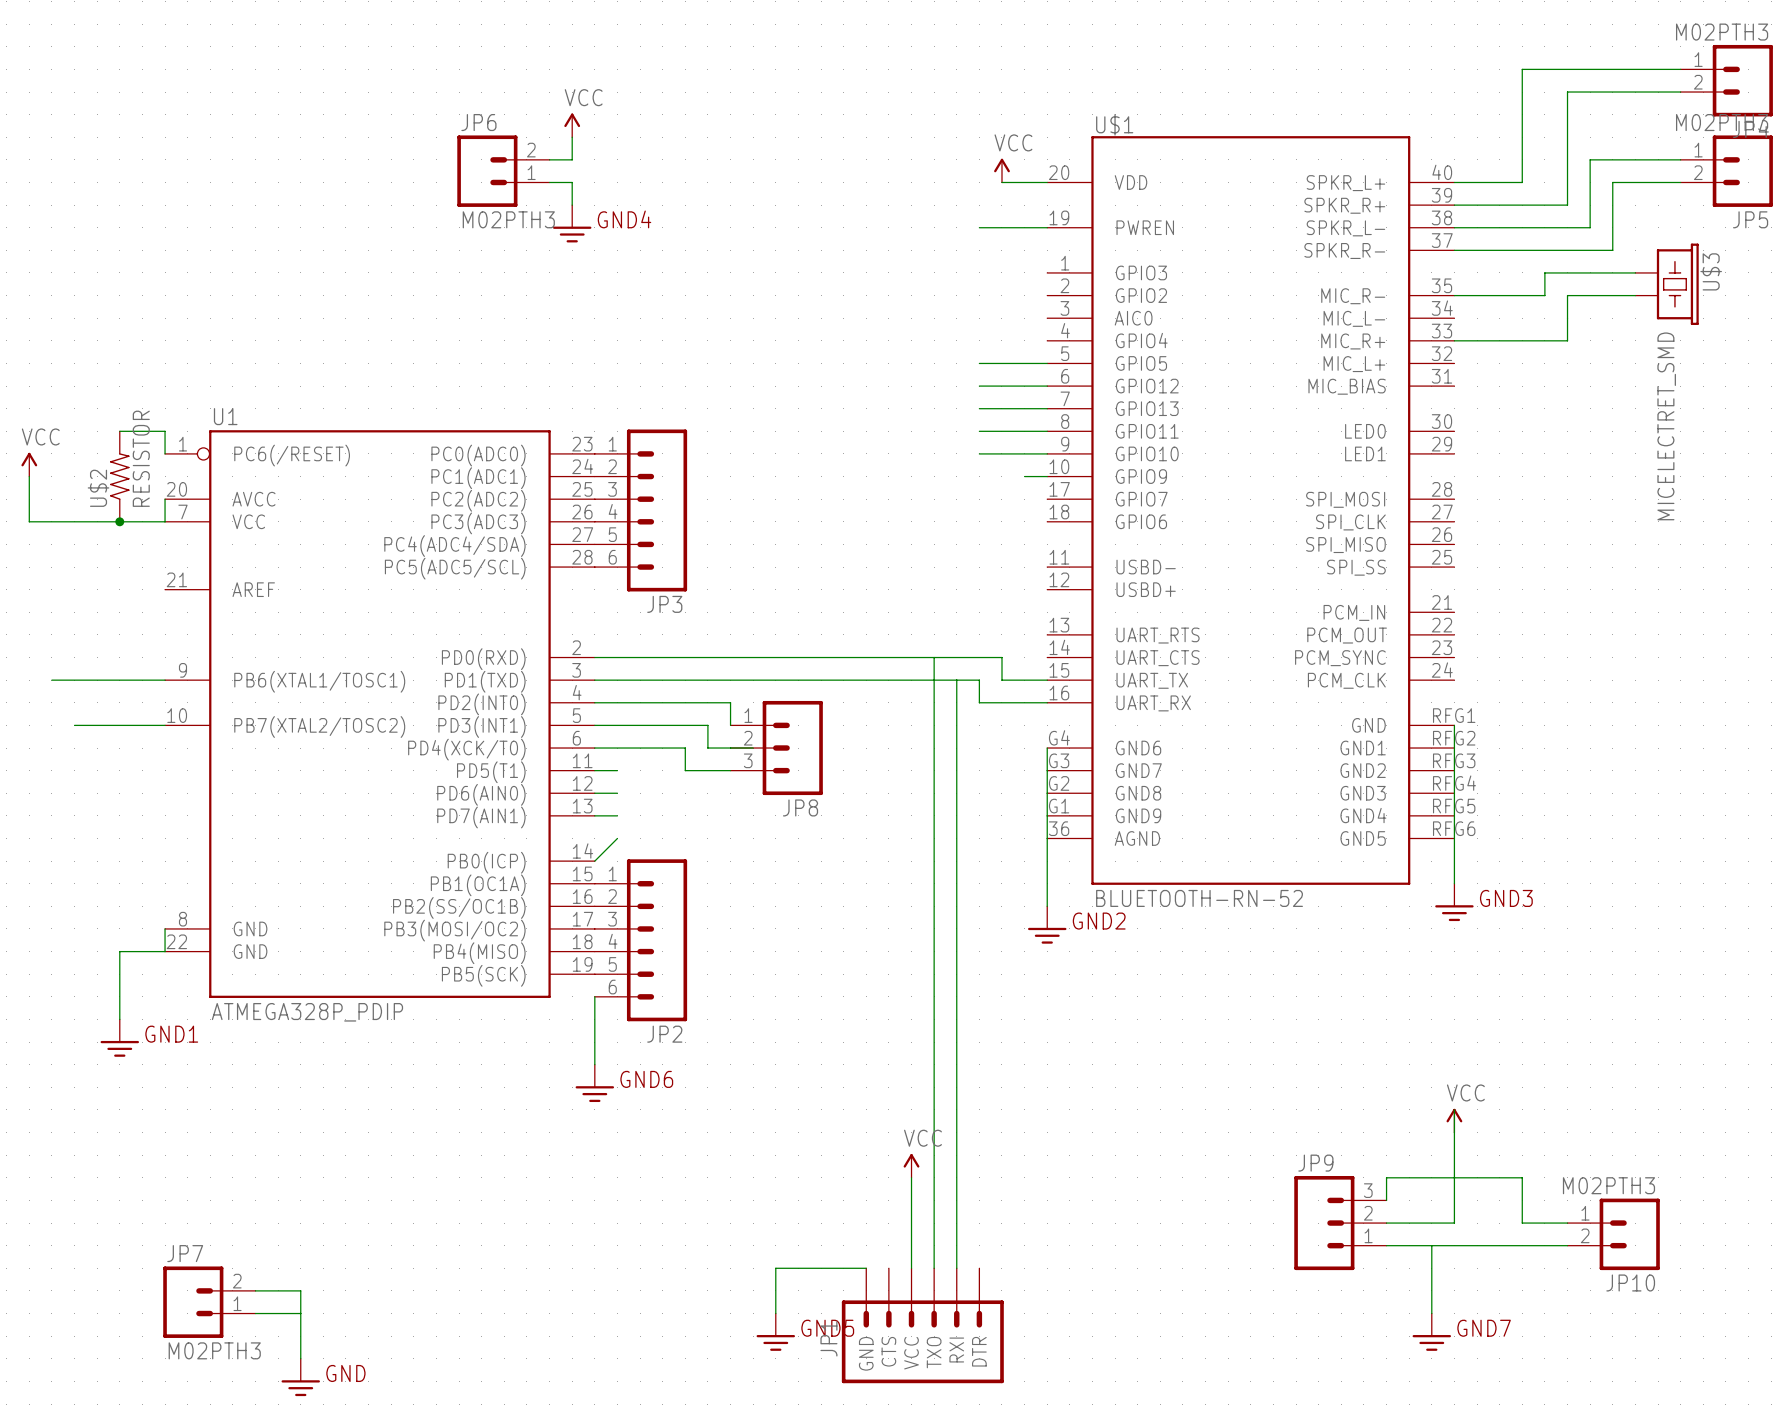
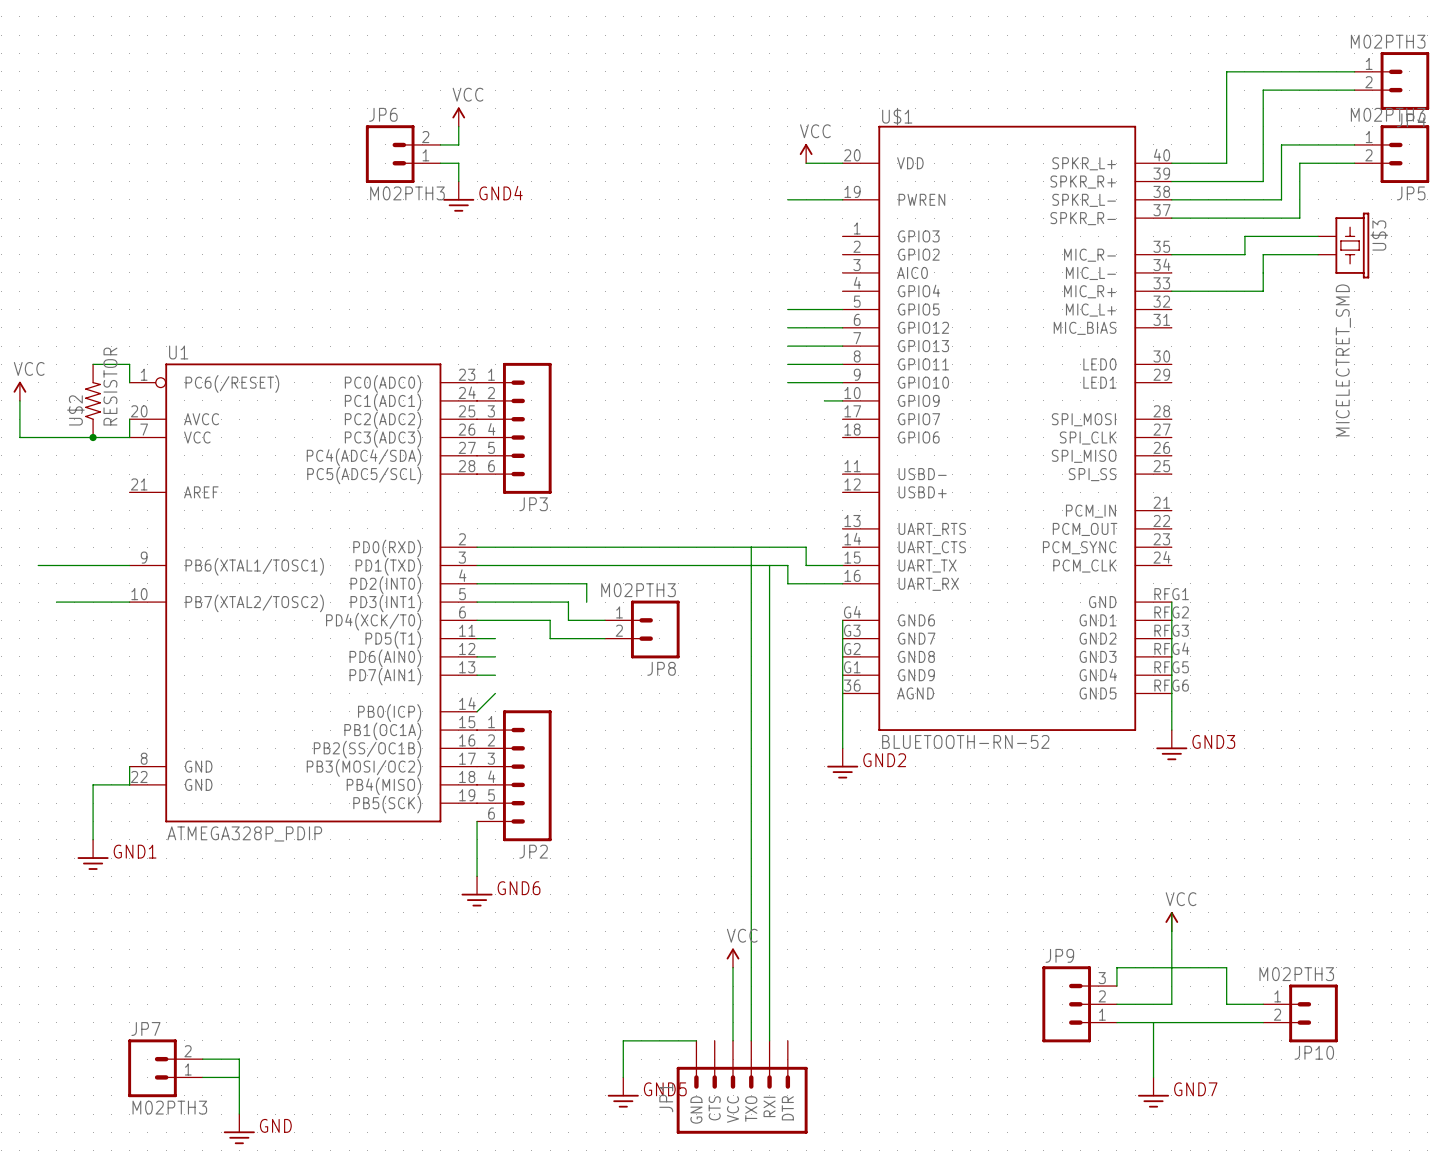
JP8 symbol: [730, 700, 823, 796] -> [605, 600, 680, 659]
JP8 value: none -> M02PTH3 (638, 590)

